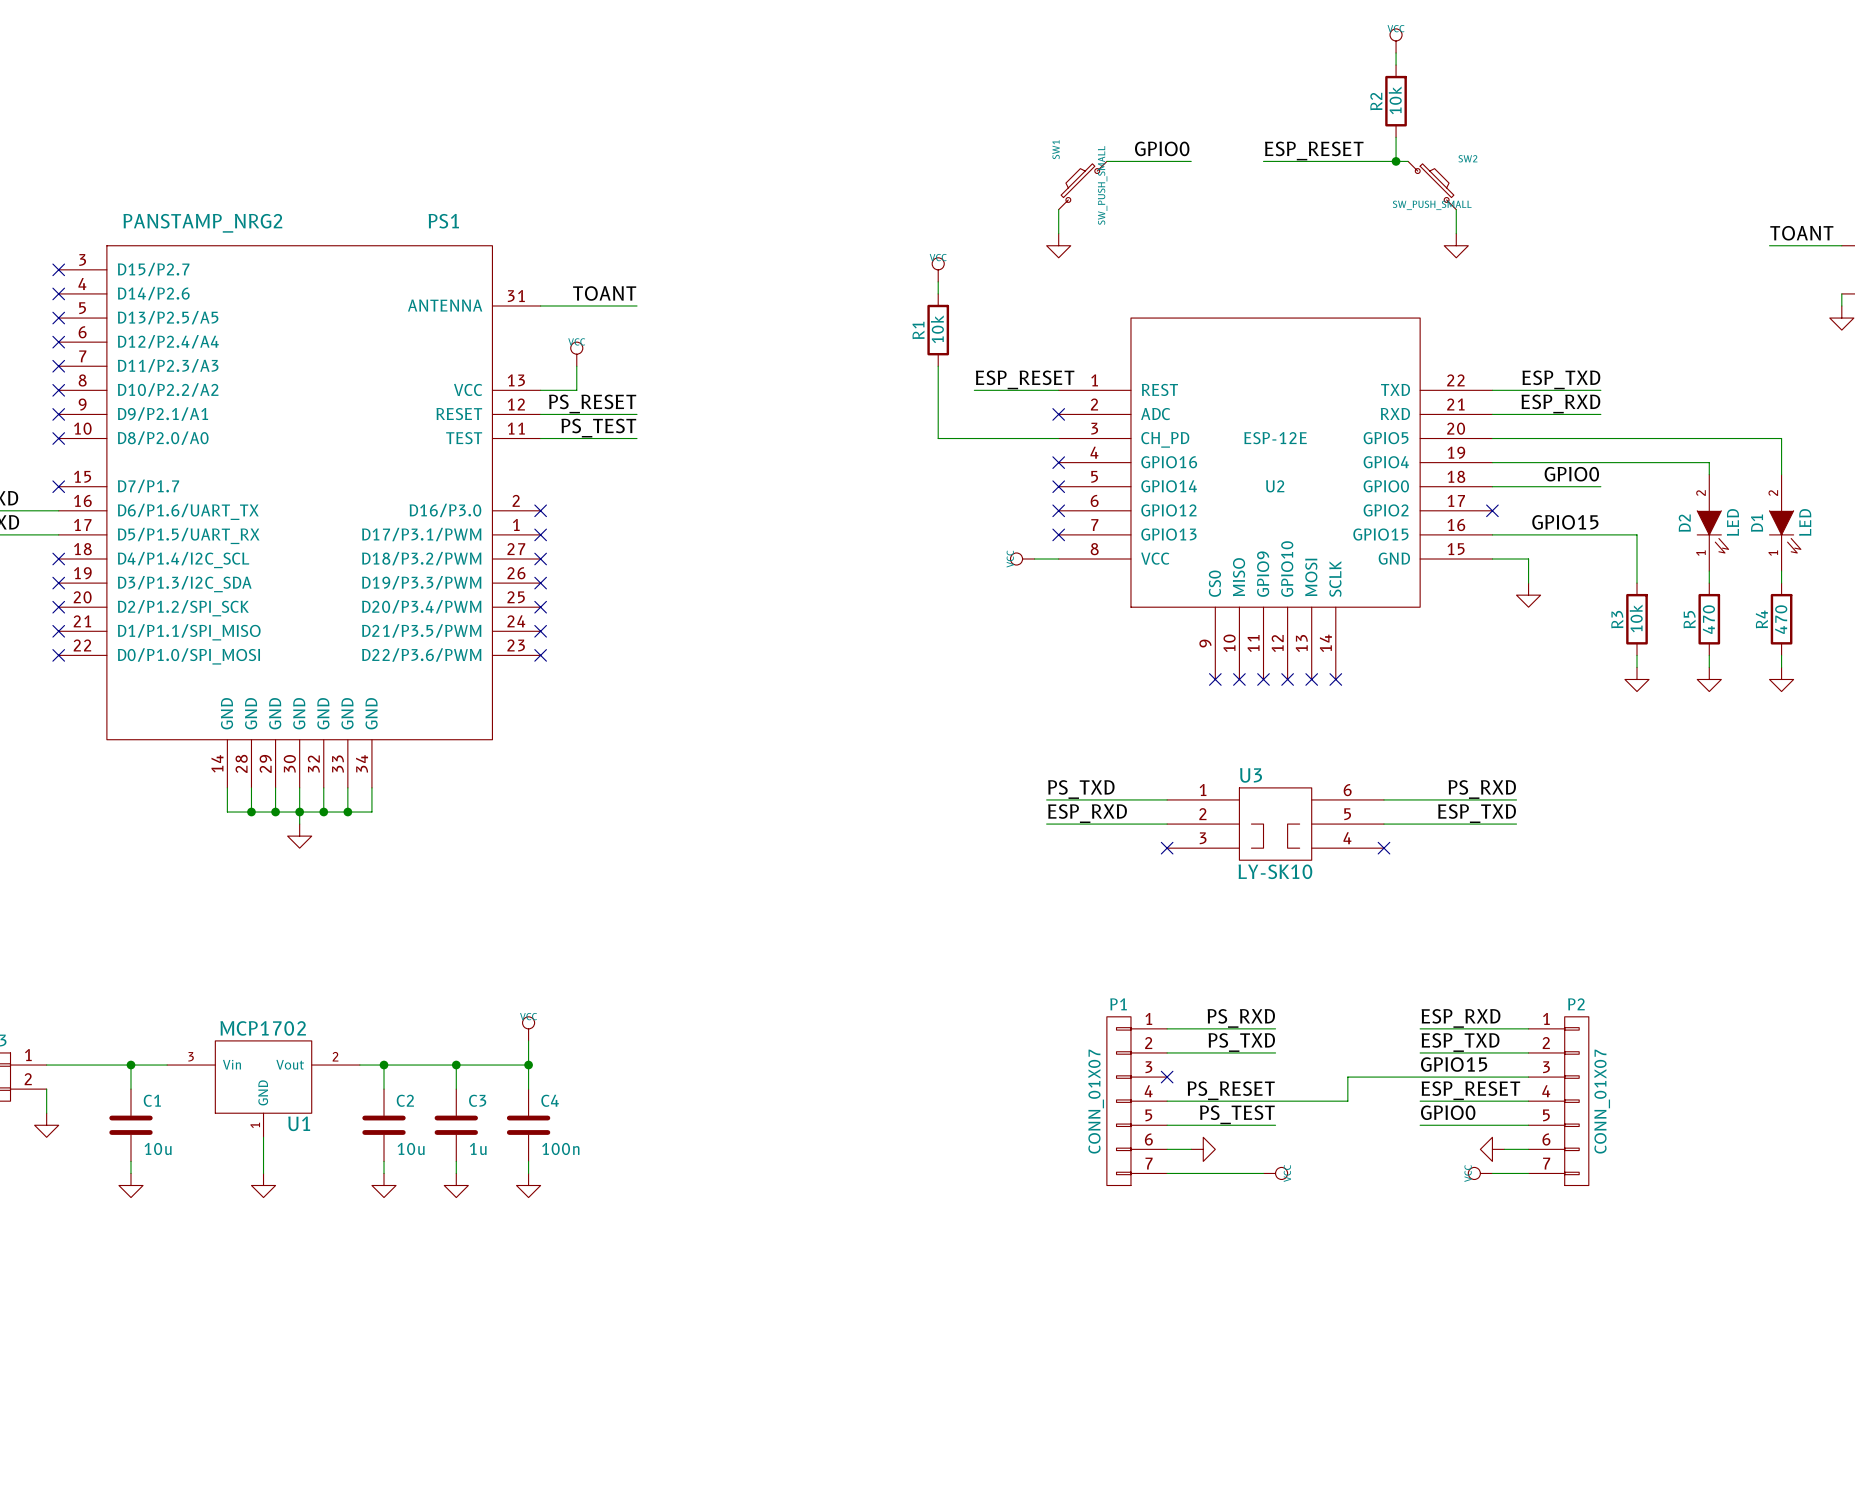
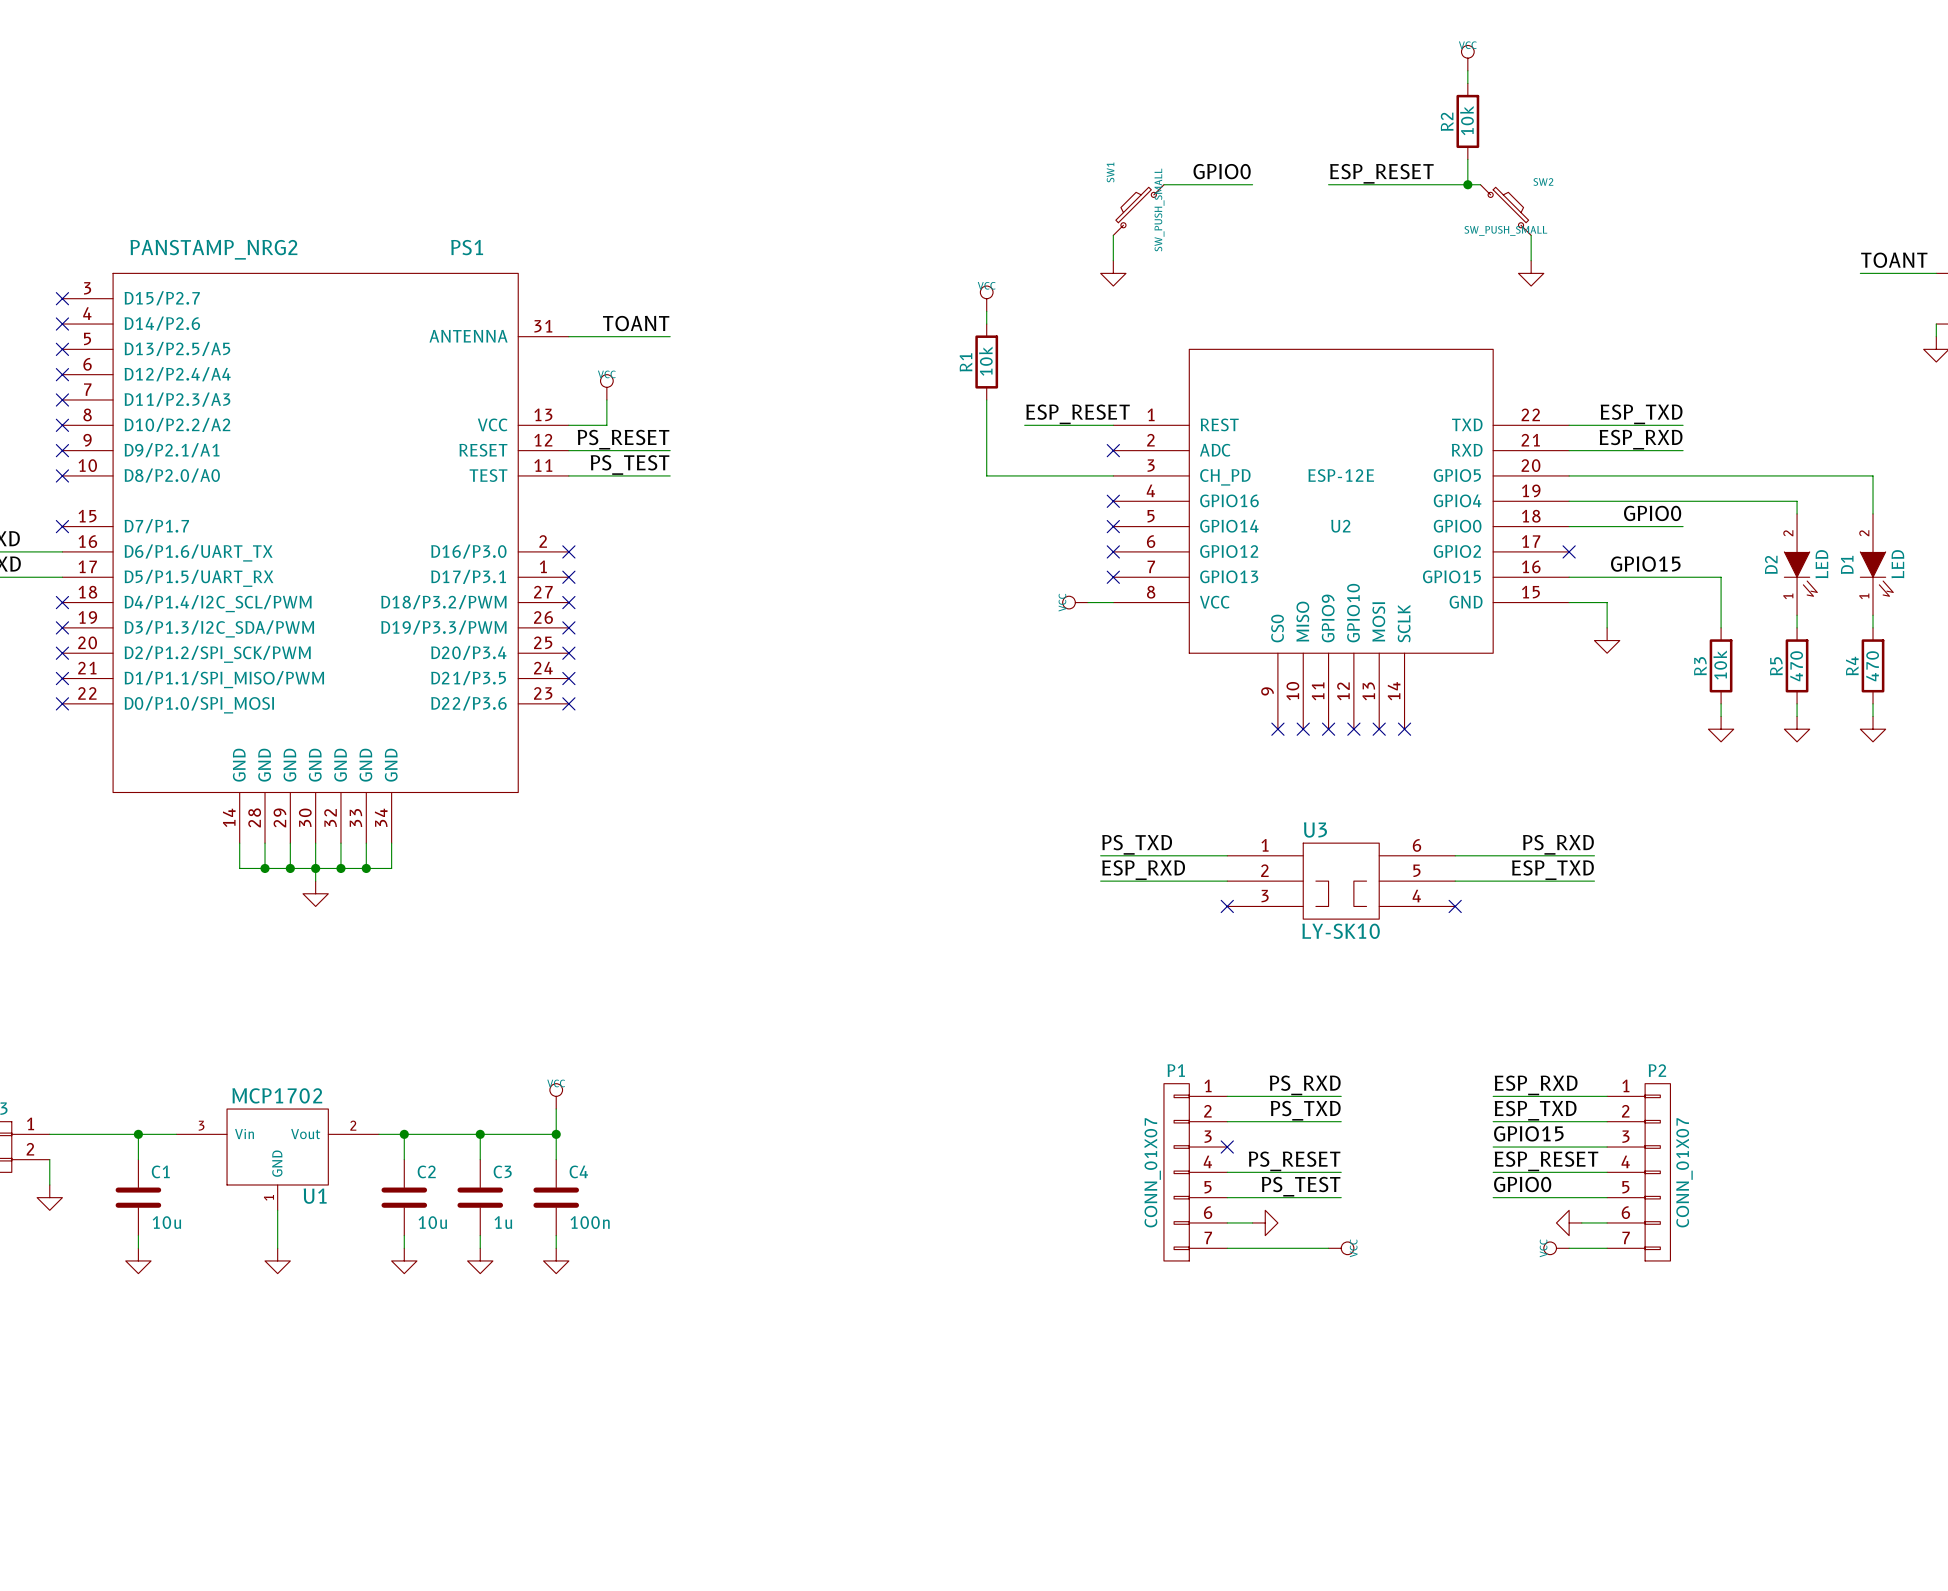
PS1 pin name: D17/P3.1/PWM (421, 534) -> D17/P3.1 (468, 576)
PS1 pin name: D4/P1.4/I2C_SCL (183, 560) -> D4/P1.4/I2C_SCL/PWM (218, 603)
PS1 pin name: D3/P1.3/I2C_SDA (184, 584) -> D3/P1.3/I2C_SDA/PWM (219, 628)
PS1 pin name: D20/P3.4/PWM (421, 606) -> D20/P3.4 (468, 652)
PS1 pin name: D2/P1.2/SPI_SCK (183, 608) -> D2/P1.2/SPI_SCK/PWM (217, 654)
PS1 pin name: D21/P3.5/PWM (421, 630) -> D21/P3.5 (468, 678)
PS1 pin name: D1/P1.1/SPI_MISO (189, 632) -> D1/P1.1/SPI_MISO/PWM (224, 679)
PS1 pin name: D22/P3.6/PWM (421, 655) -> D22/P3.6 (468, 703)
wire: (1420, 1077) (1347, 1077) (1347, 1101) (1275, 1101) -> none

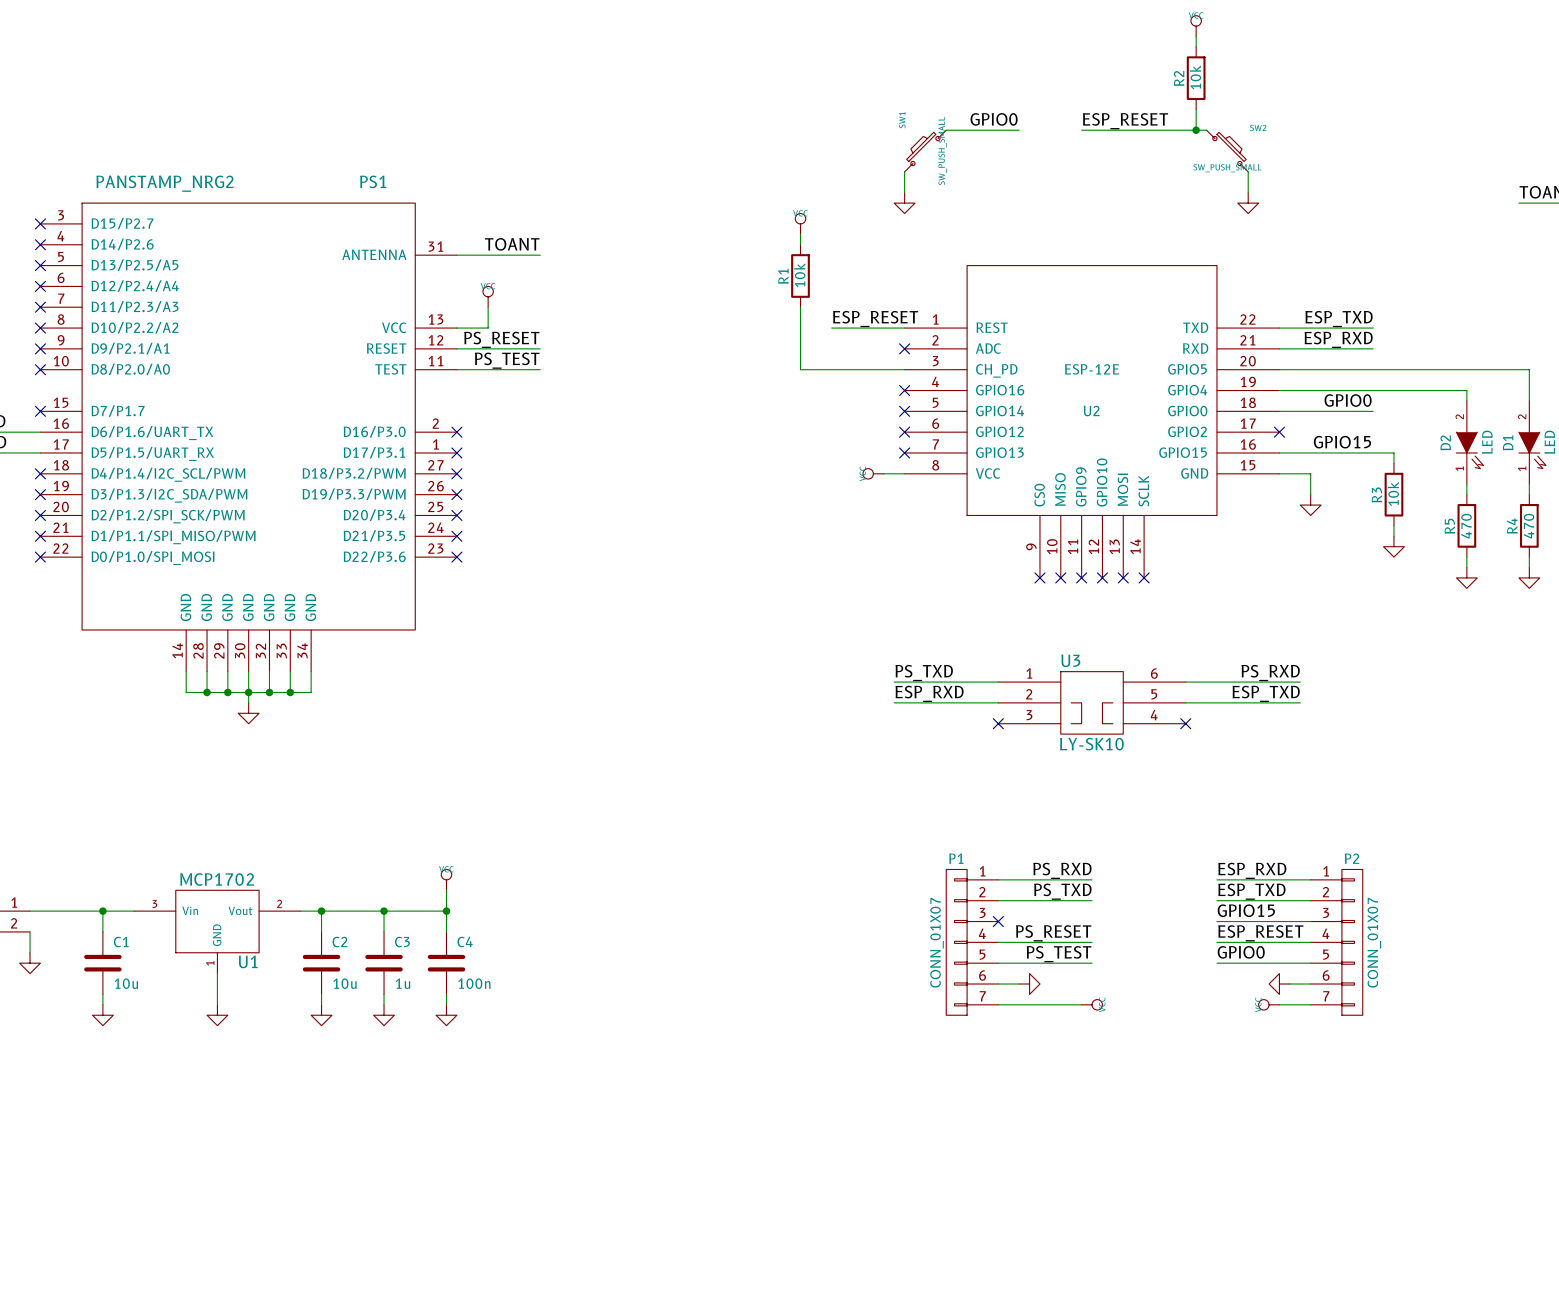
wire: (1708, 577) (1721, 577) (1721, 627) -> (1393, 452) (1393, 463)
R3 position: (1721, 665) -> (1393, 494)
wire: (1721, 703) (1721, 716) -> (1393, 525) (1393, 536)
power symbol position: (1721, 729) -> (1393, 546)

